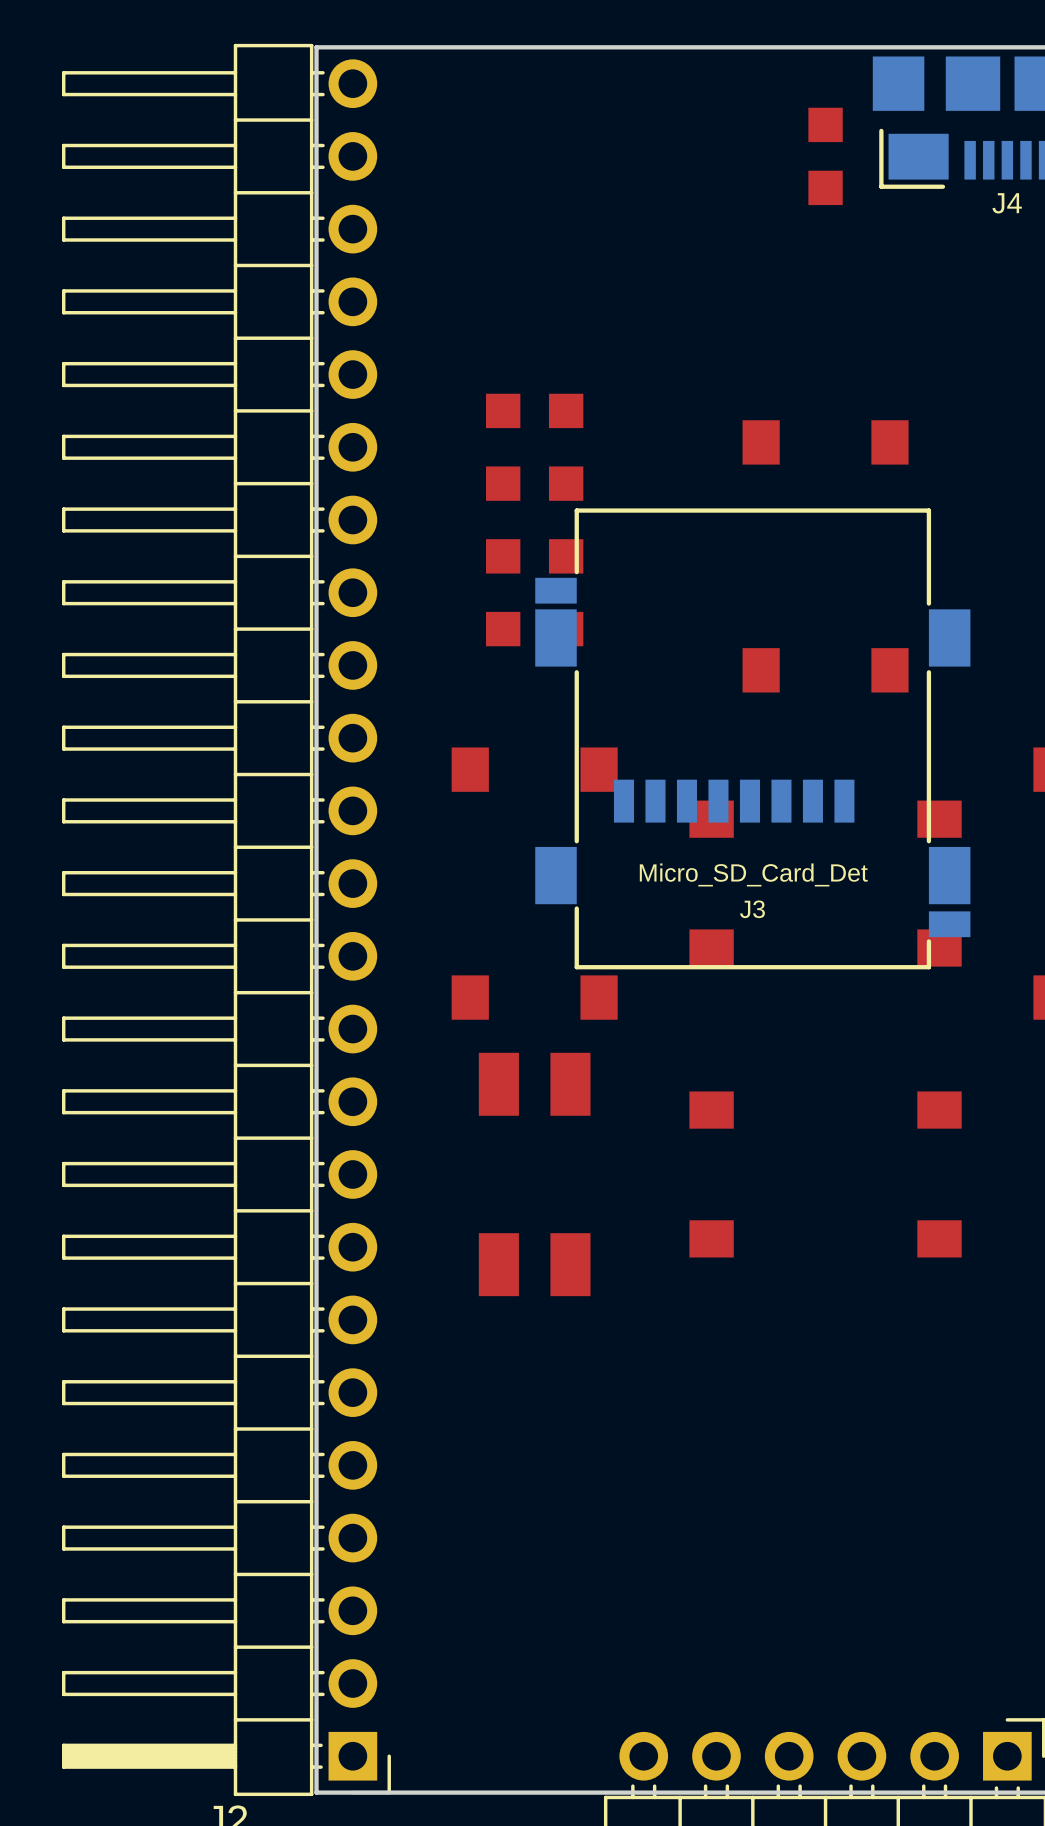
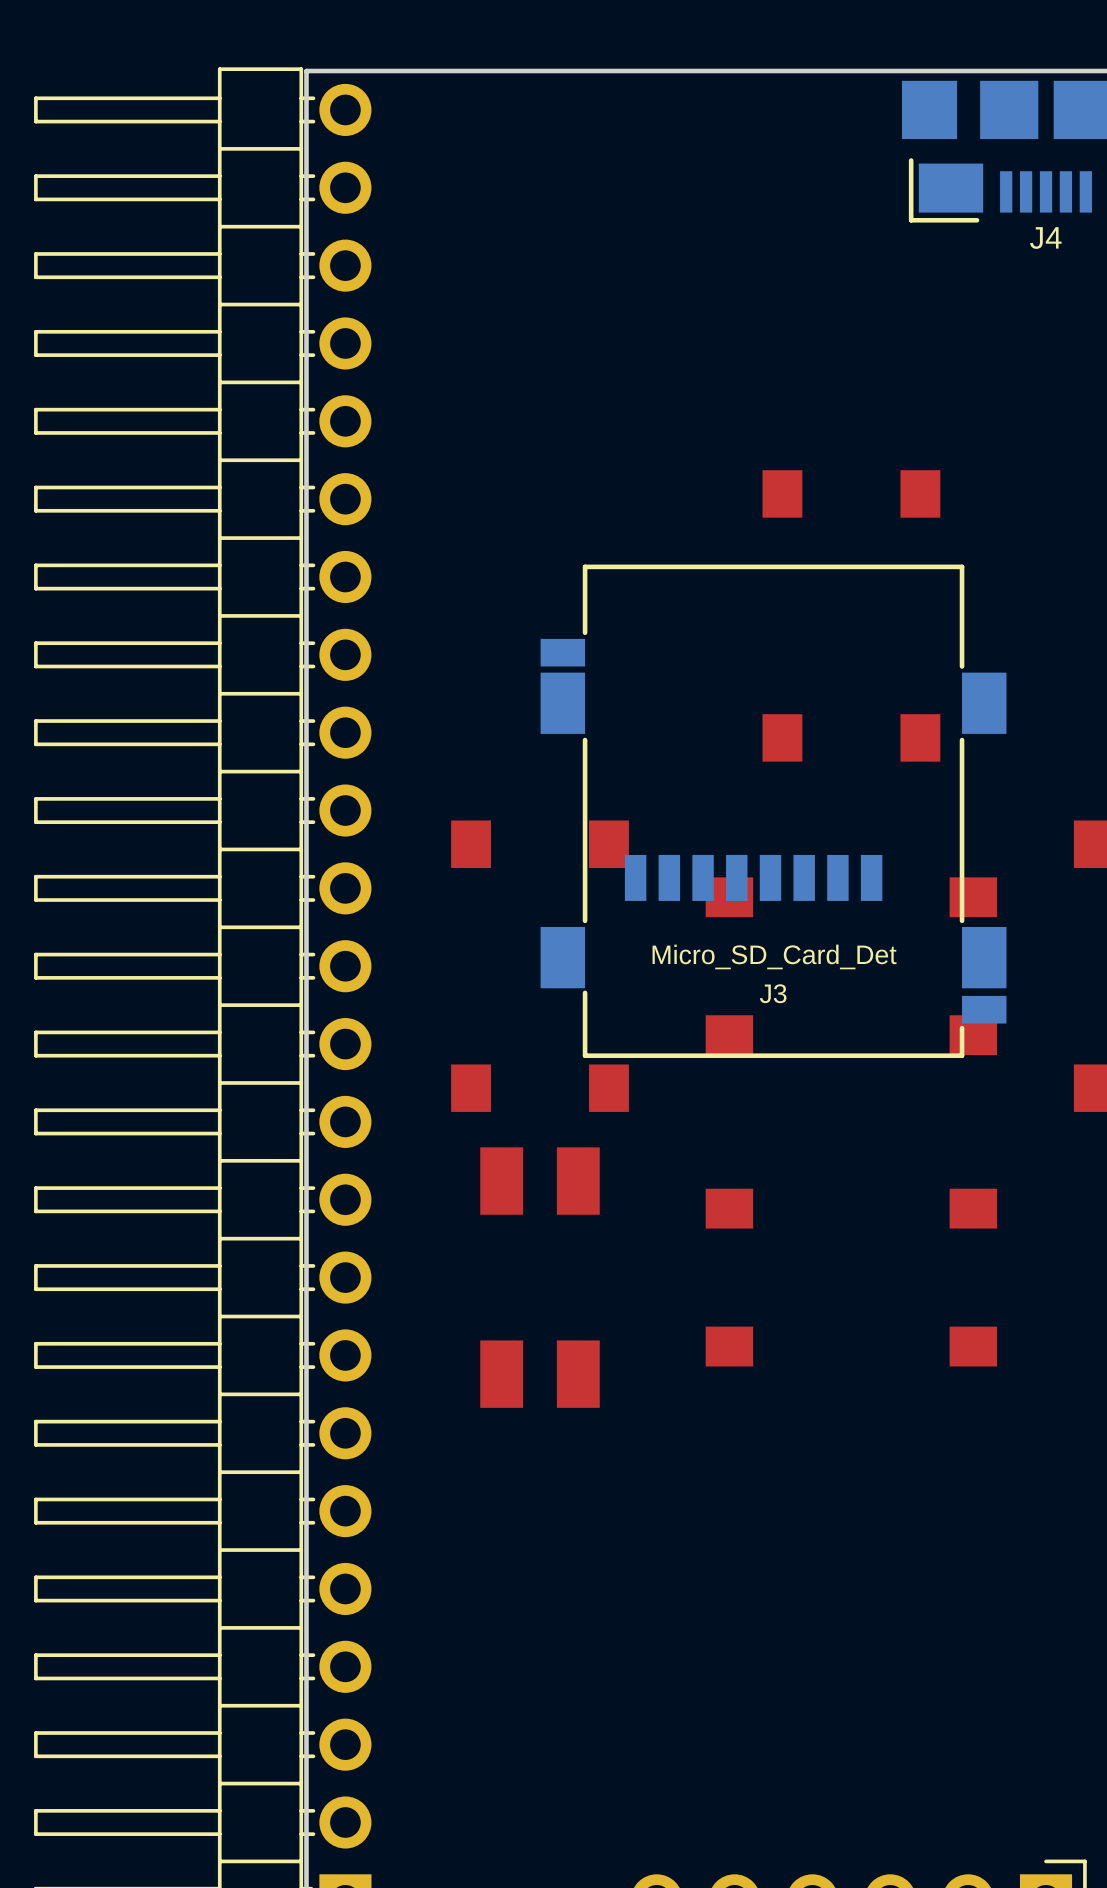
part: (825, 156) -> none
part: (534, 410) -> none
part: (534, 483) -> none
part: (534, 556) -> none
part: (534, 629) -> none

